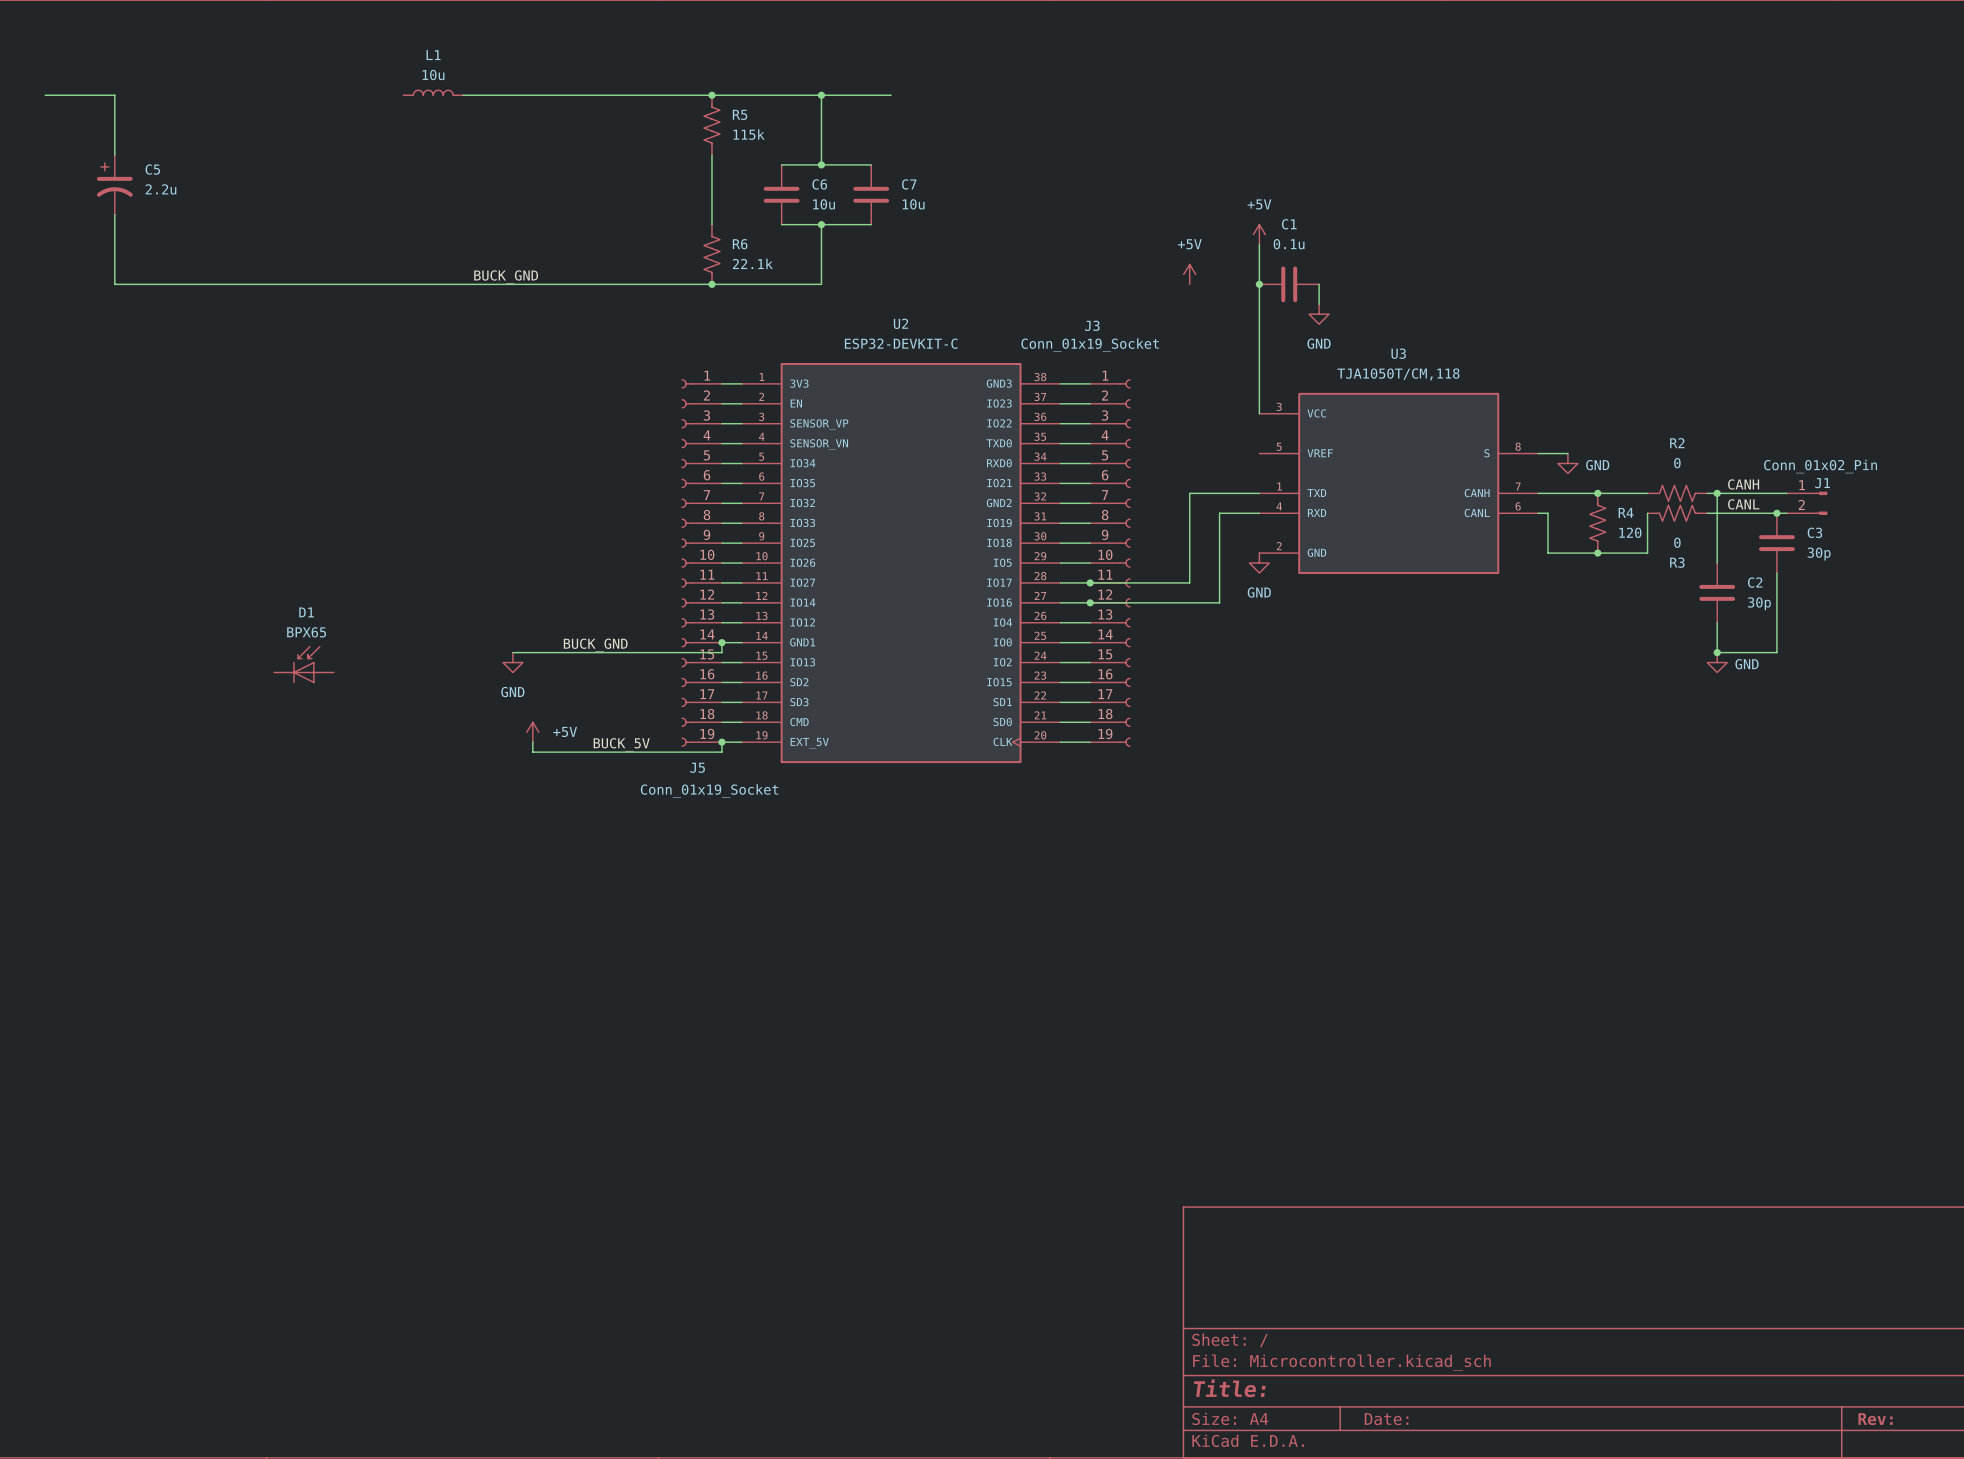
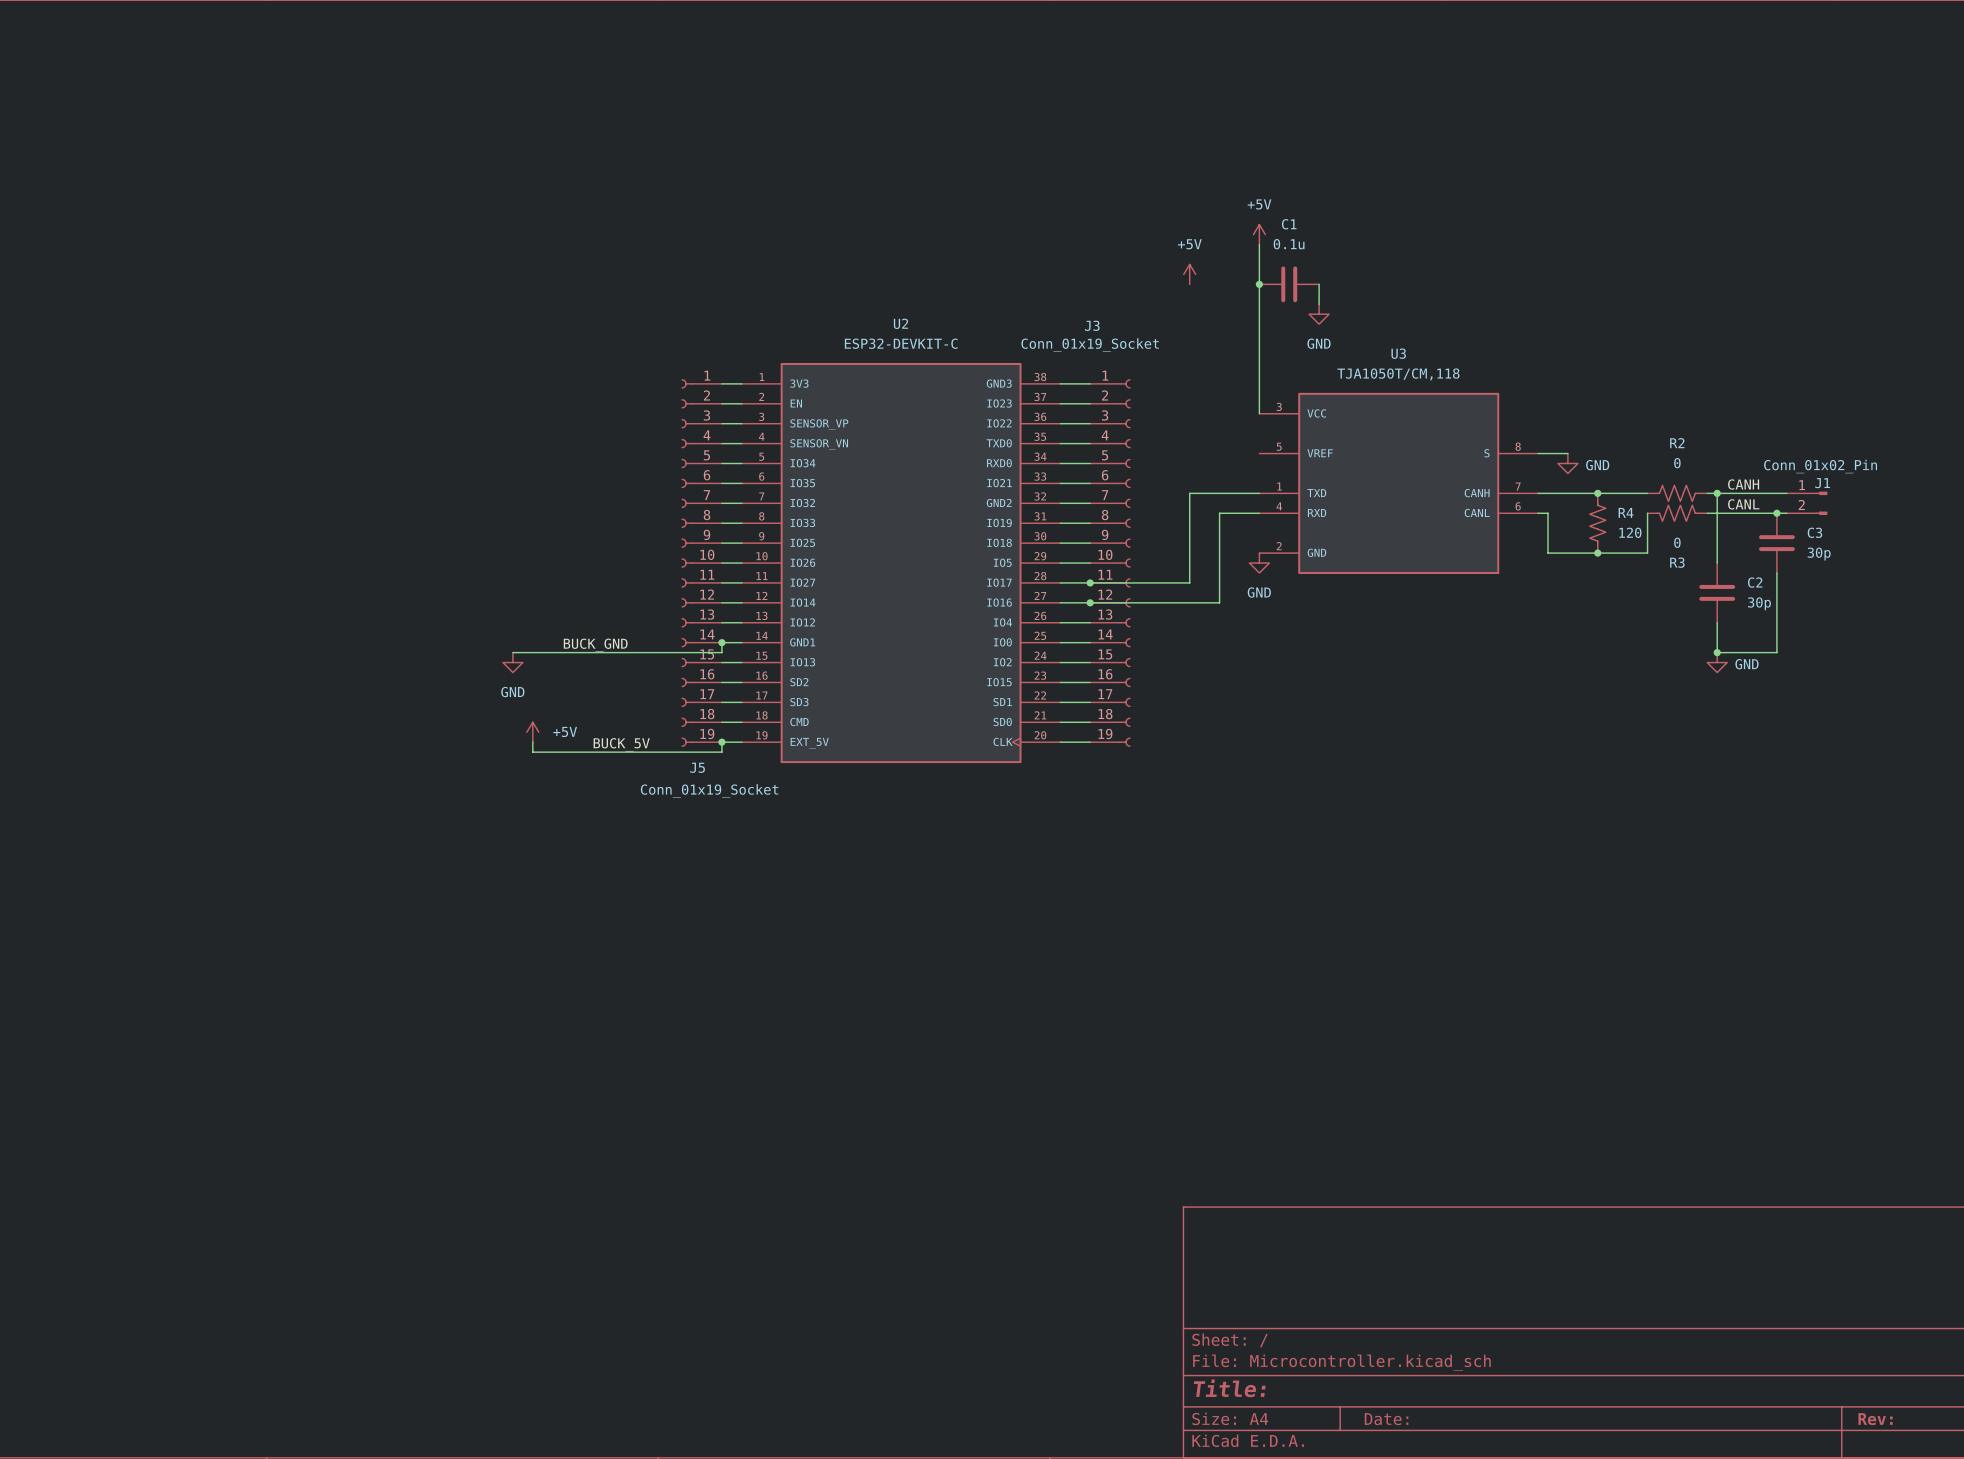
L1: 10u (433, 92) -> none
wire: (45, 95) (114, 95) (114, 154) -> none
wire: (463, 95) (891, 95) -> none
junction: (711, 95) -> none
wire: (821, 95) (821, 164) -> none
junction: (821, 95) -> none
R5: 115k (711, 125) -> none
wire: (711, 154) (711, 224) -> none
wire: (781, 164) (871, 164) -> none
junction: (821, 164) -> none
C5: 2.2u (114, 184) -> none
C6: 10u (781, 194) -> none
C7: 10u (871, 194) -> none
wire: (114, 214) (114, 284) (821, 284) (821, 224) -> none
wire: (781, 224) (871, 224) -> none
junction: (821, 224) -> none
R6: 22.1k (711, 254) -> none
label: BUCK_GND (506, 277) -> none
junction: (711, 284) -> none
D1: BPX65 (303, 664) -> none

